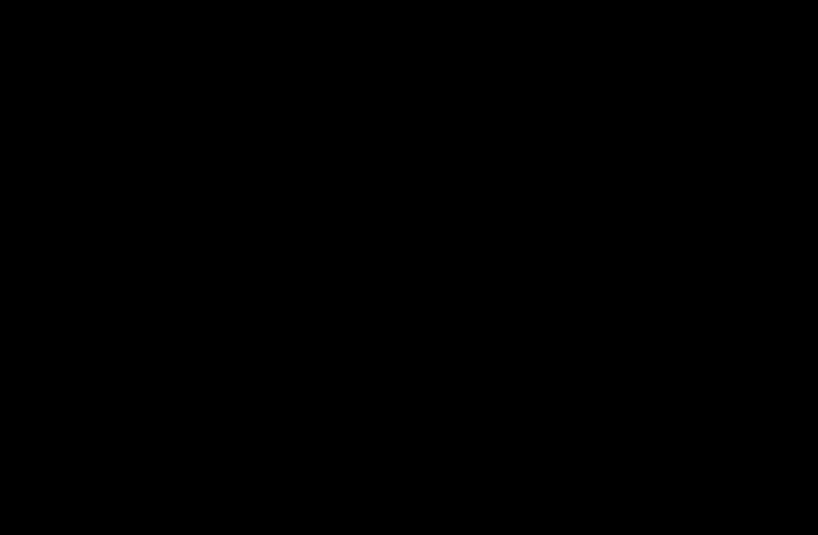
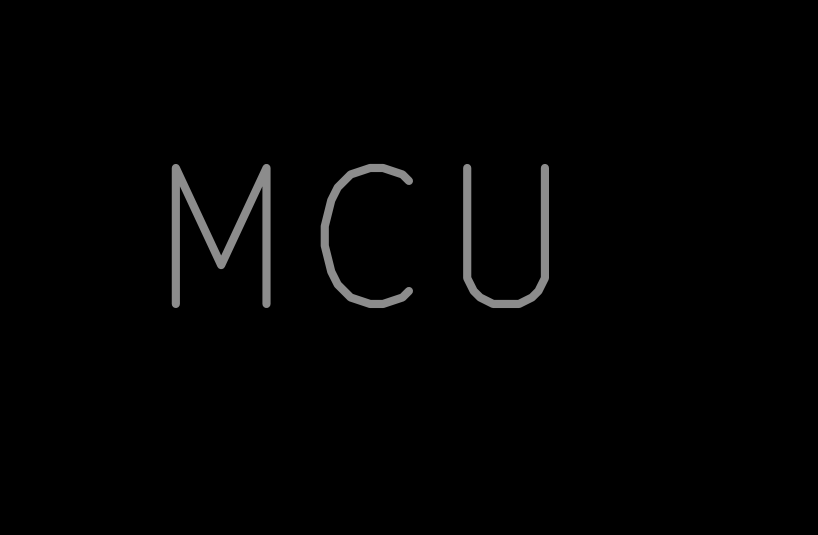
text: none -> MCU (360, 235)

